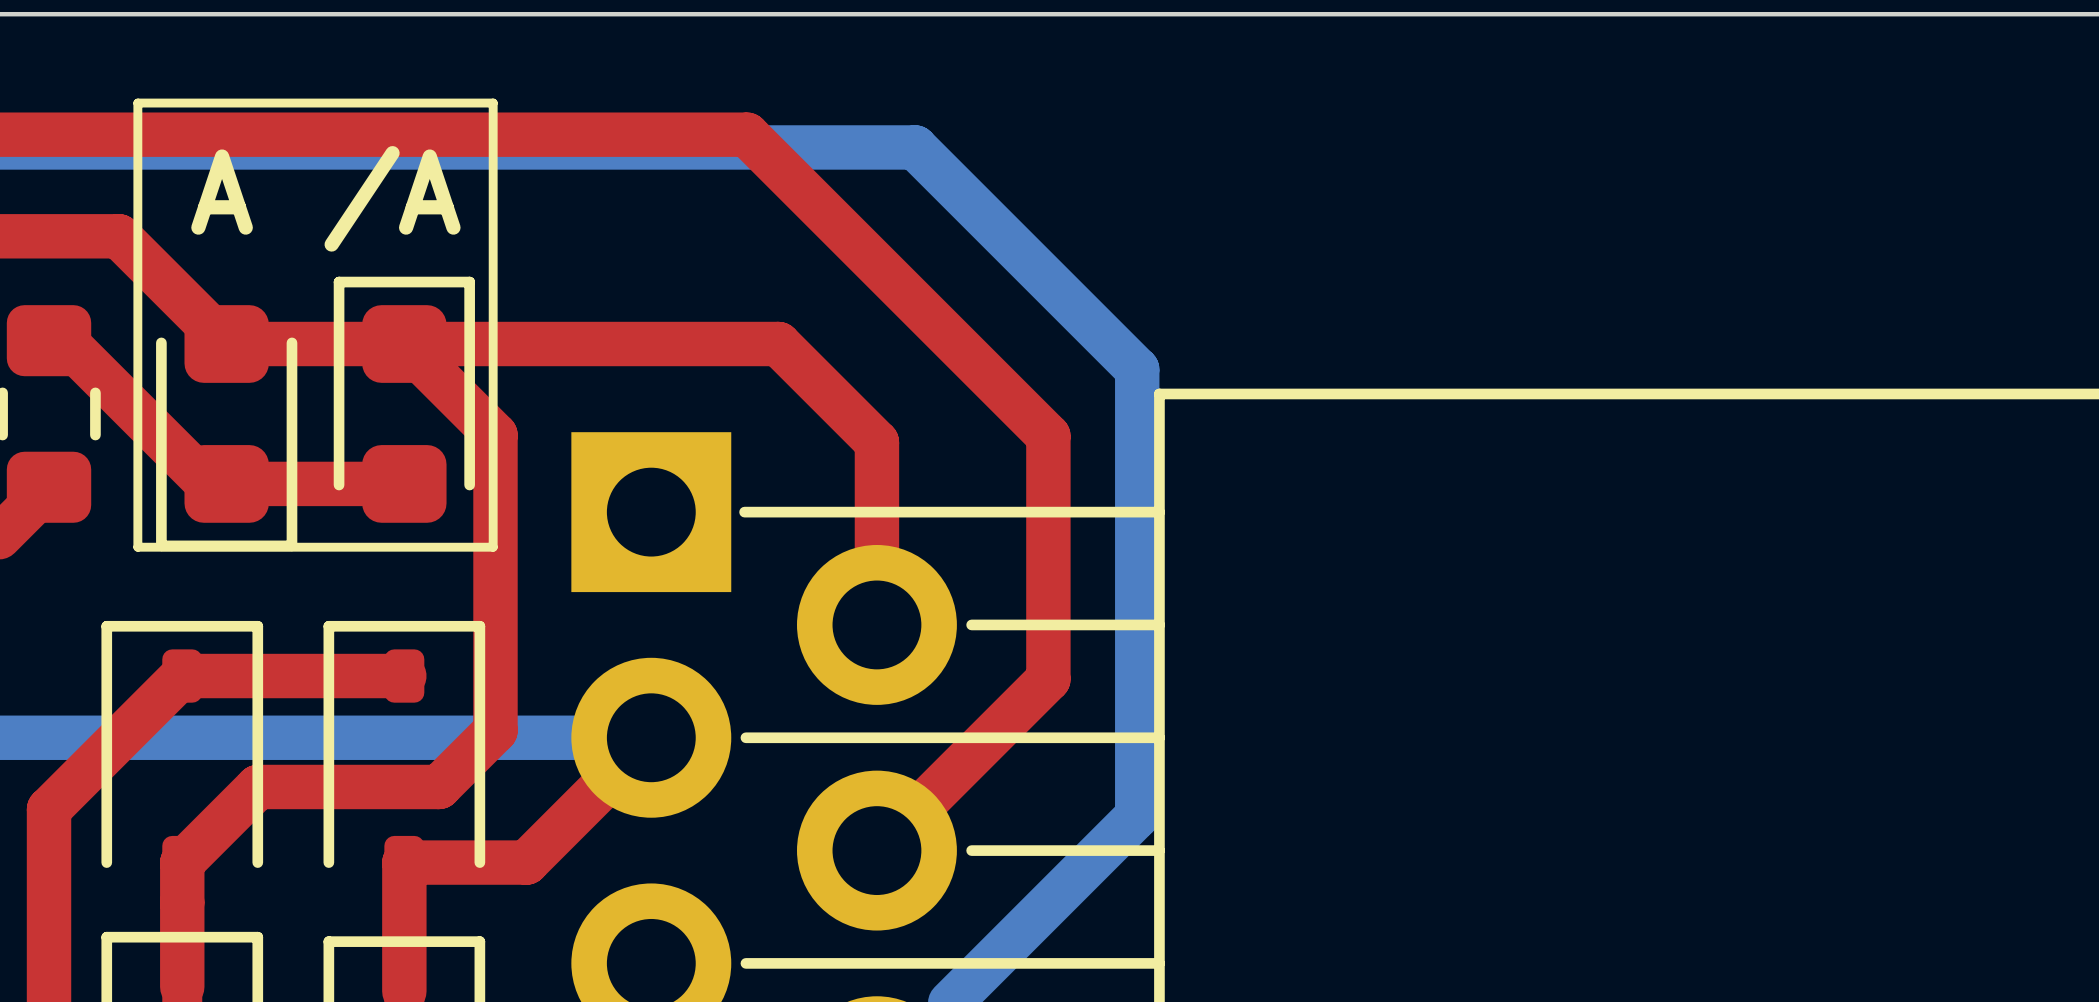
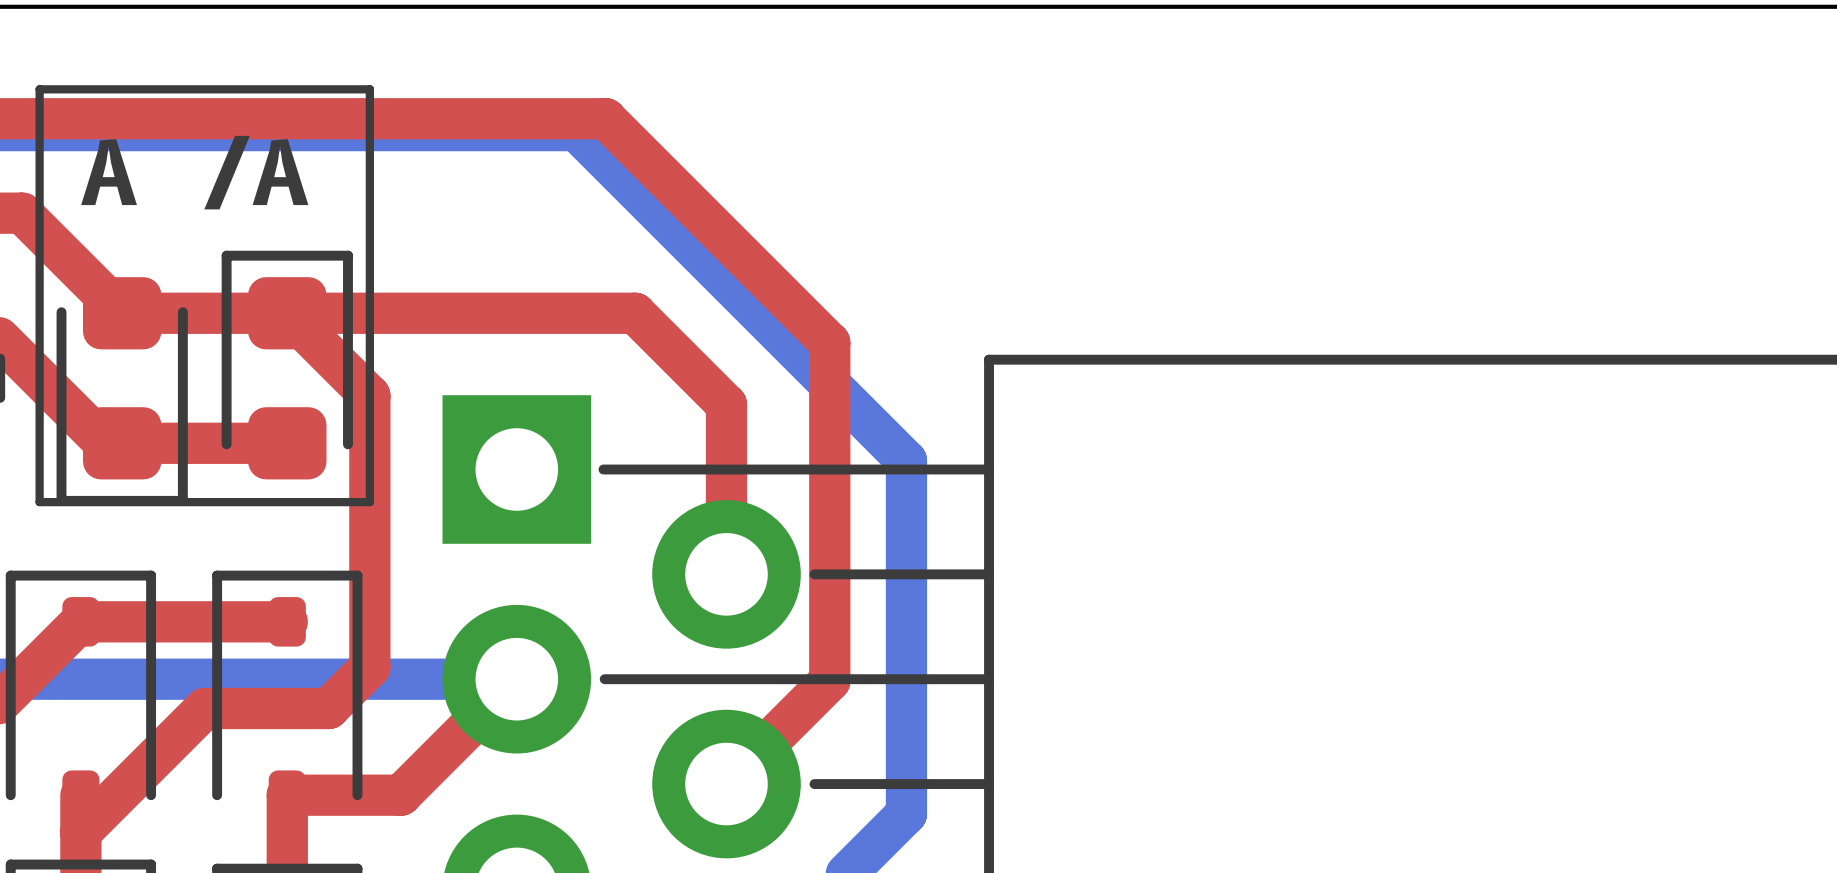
bottom track: (715, 147) (915, 147) (1137, 369) (1137, 815) (1070, 882) -> (576, 130) (906, 460) (906, 813)
top track: (988, 375) (1048, 436) (1048, 679) (988, 739) -> (829, 342) (829, 680)
top track: (493, 432) (495, 435) (495, 730) (439, 786) (257, 786) (182, 862) -> (369, 395) (369, 667) (328, 708) (204, 708) (80, 832)

